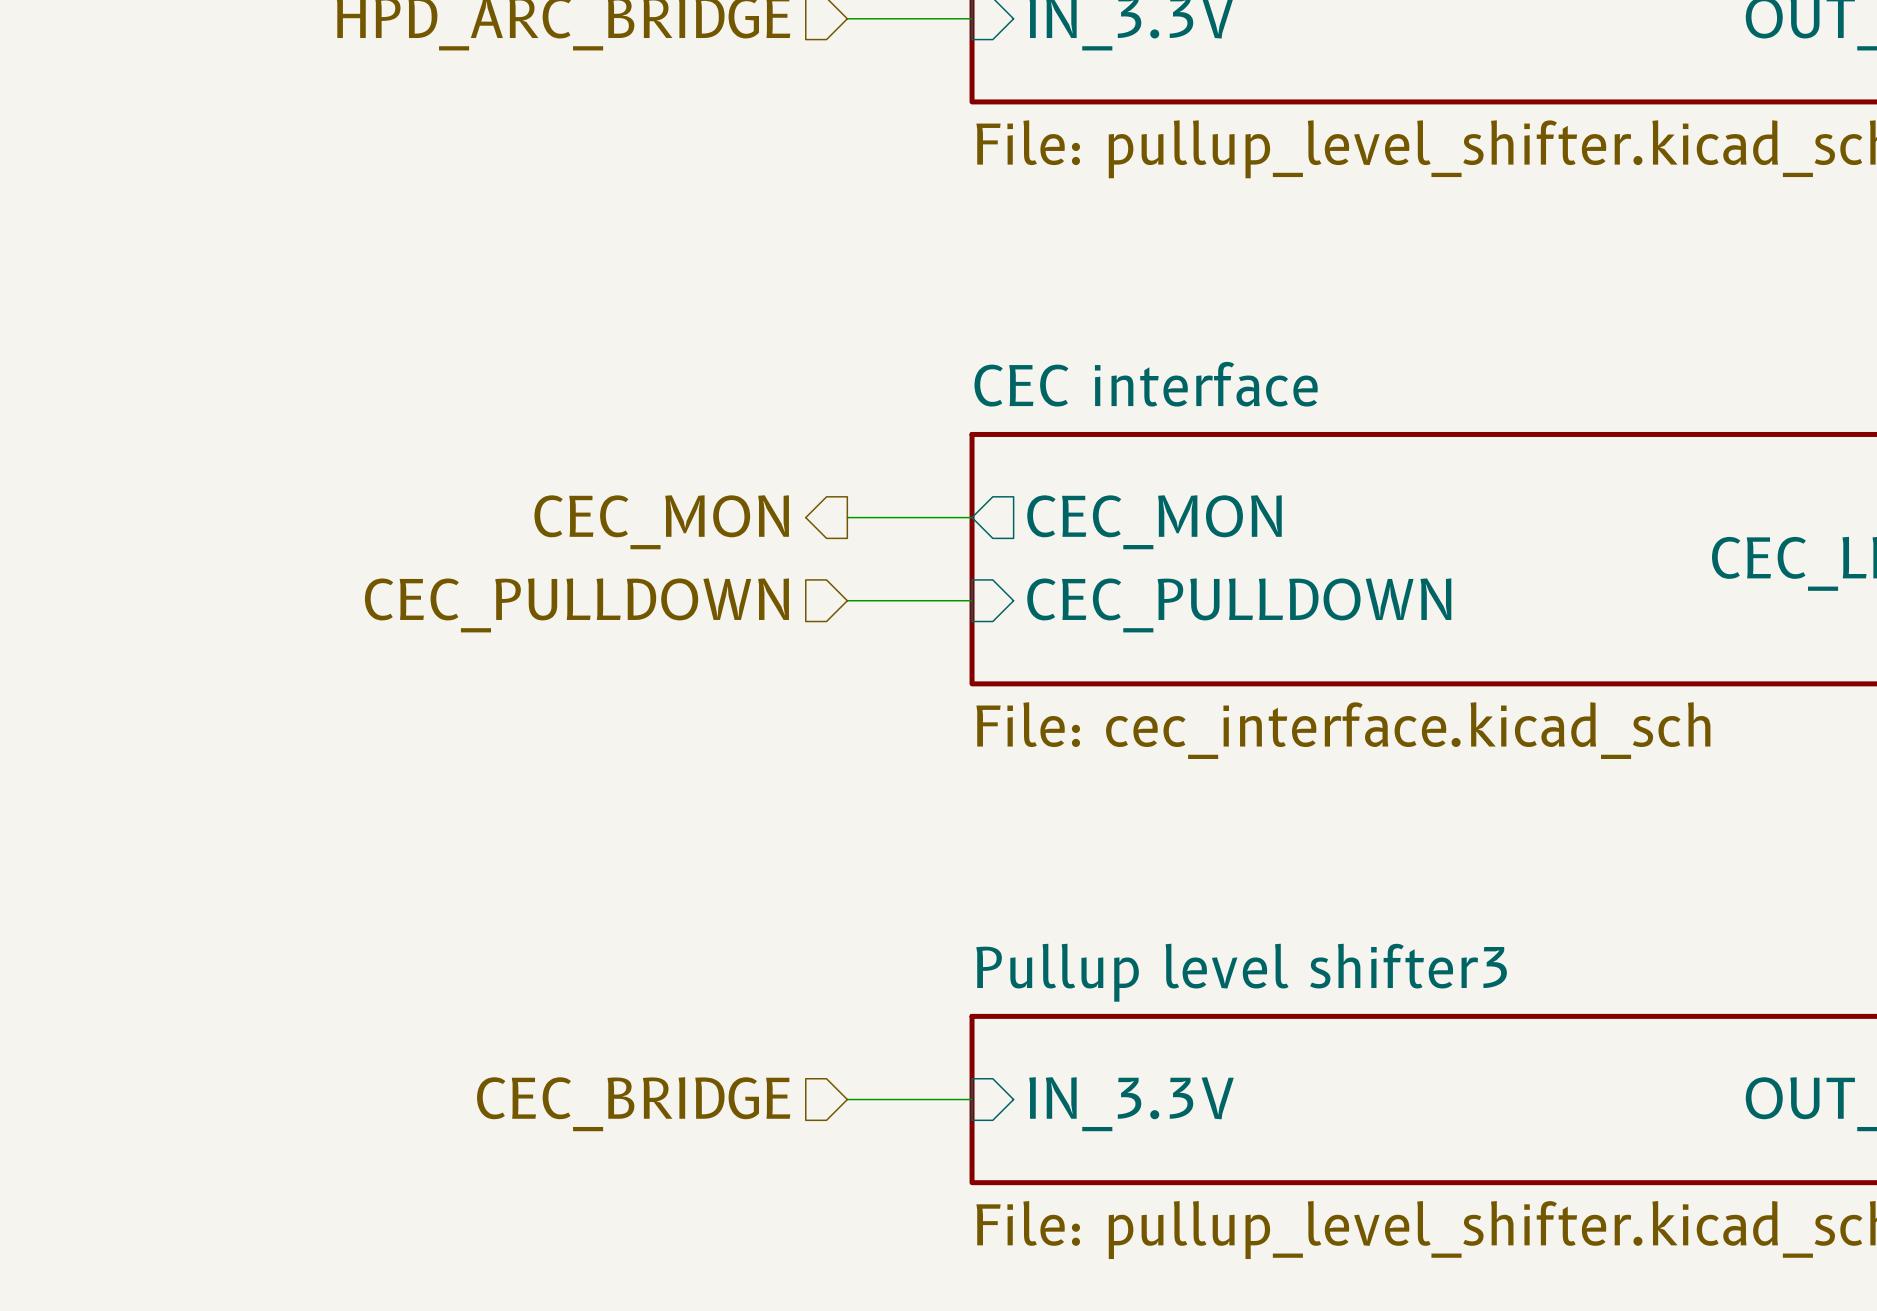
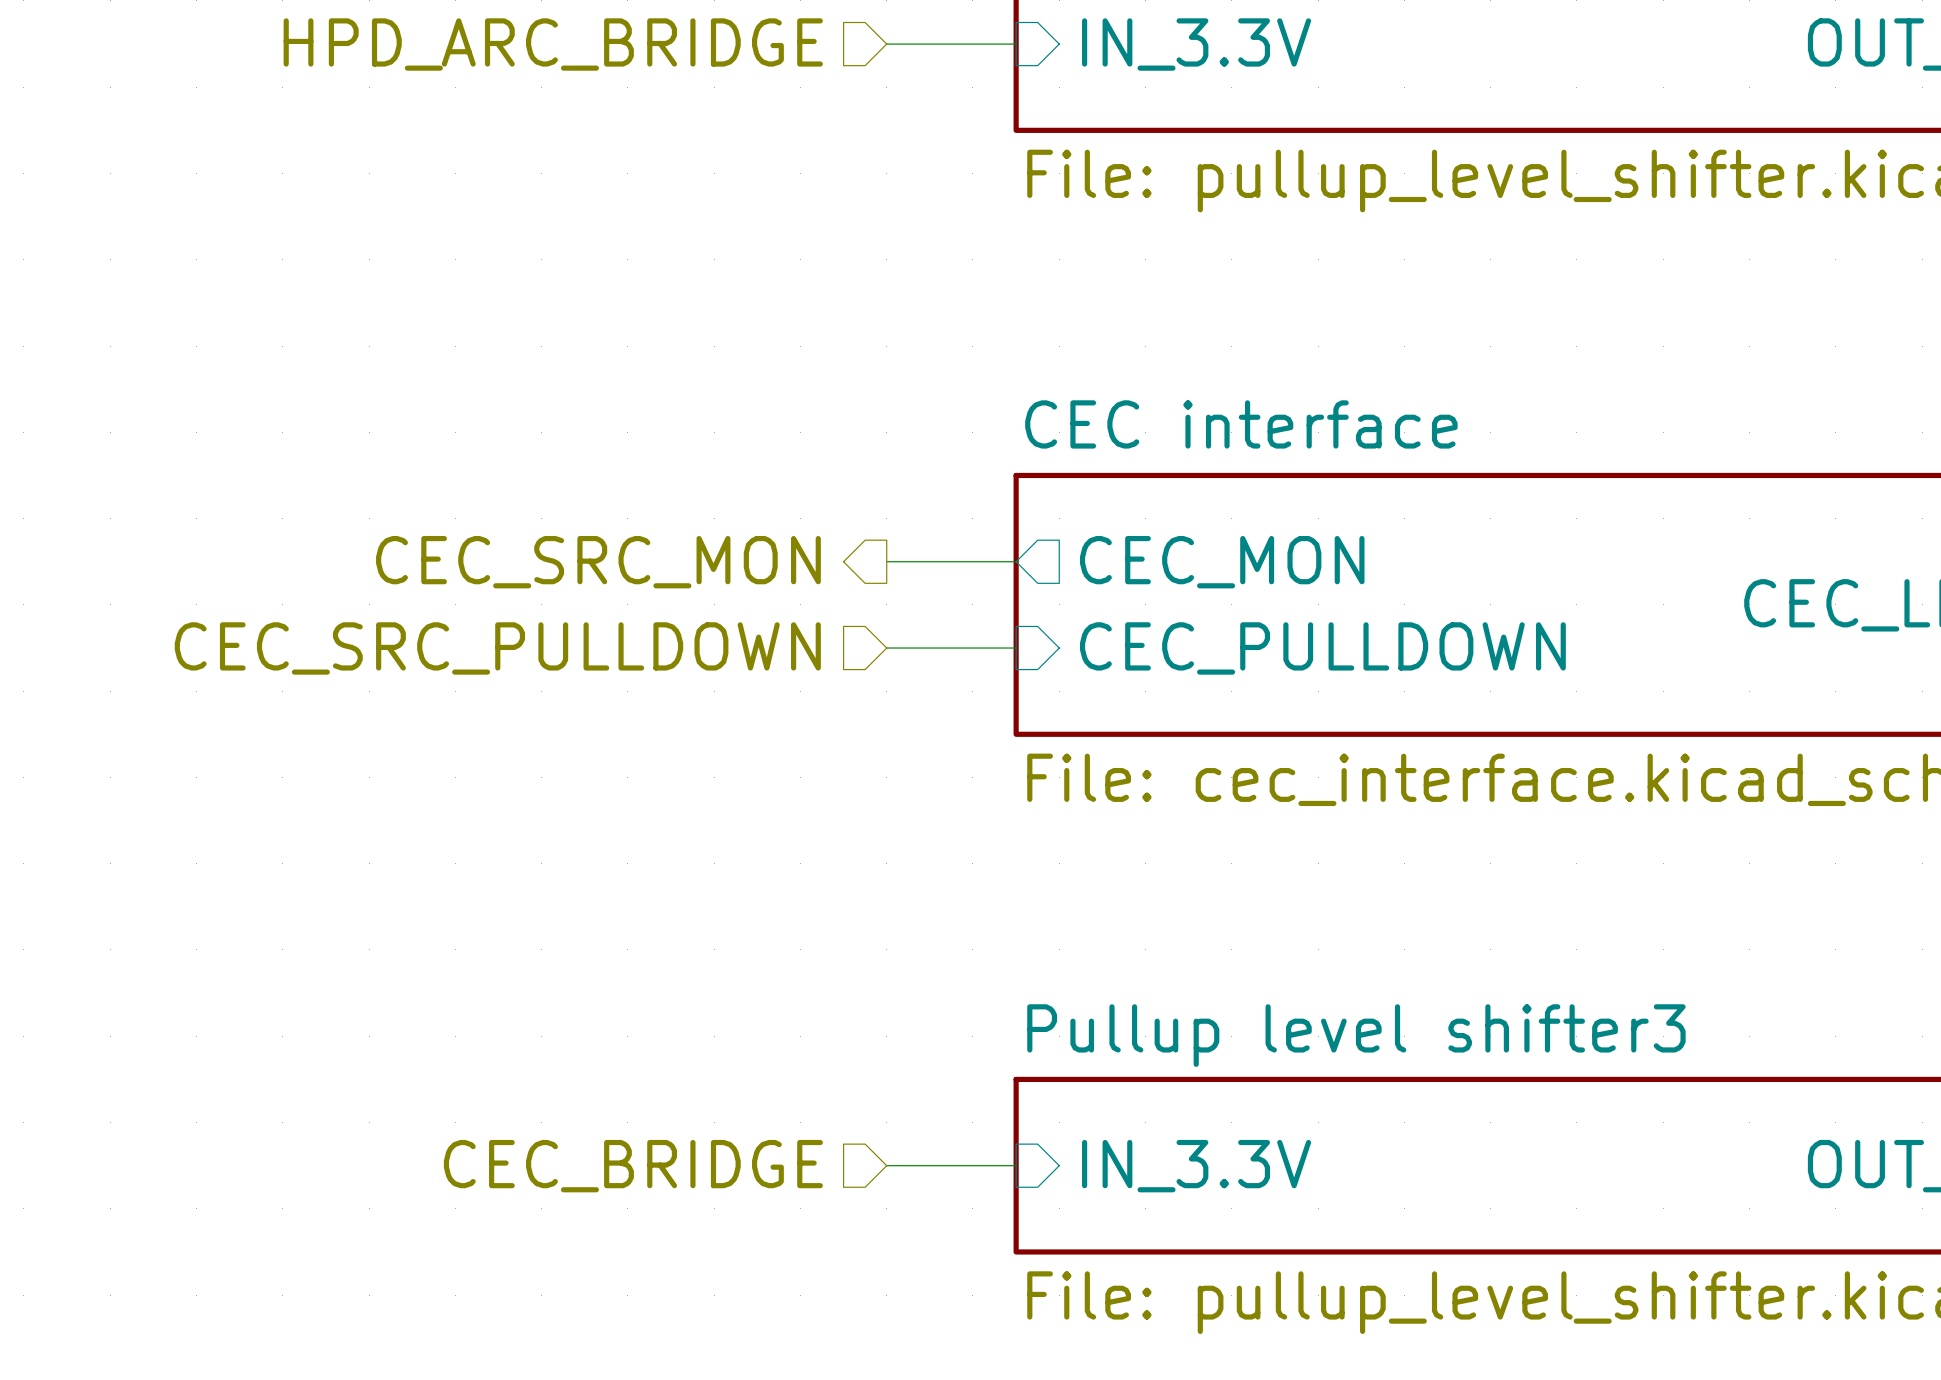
hierarchical label: CEC_MON (661, 522) -> CEC_SRC_MON (598, 562)
hierarchical label: CEC_PULLDOWN (576, 605) -> CEC_SRC_PULLDOWN (497, 648)

